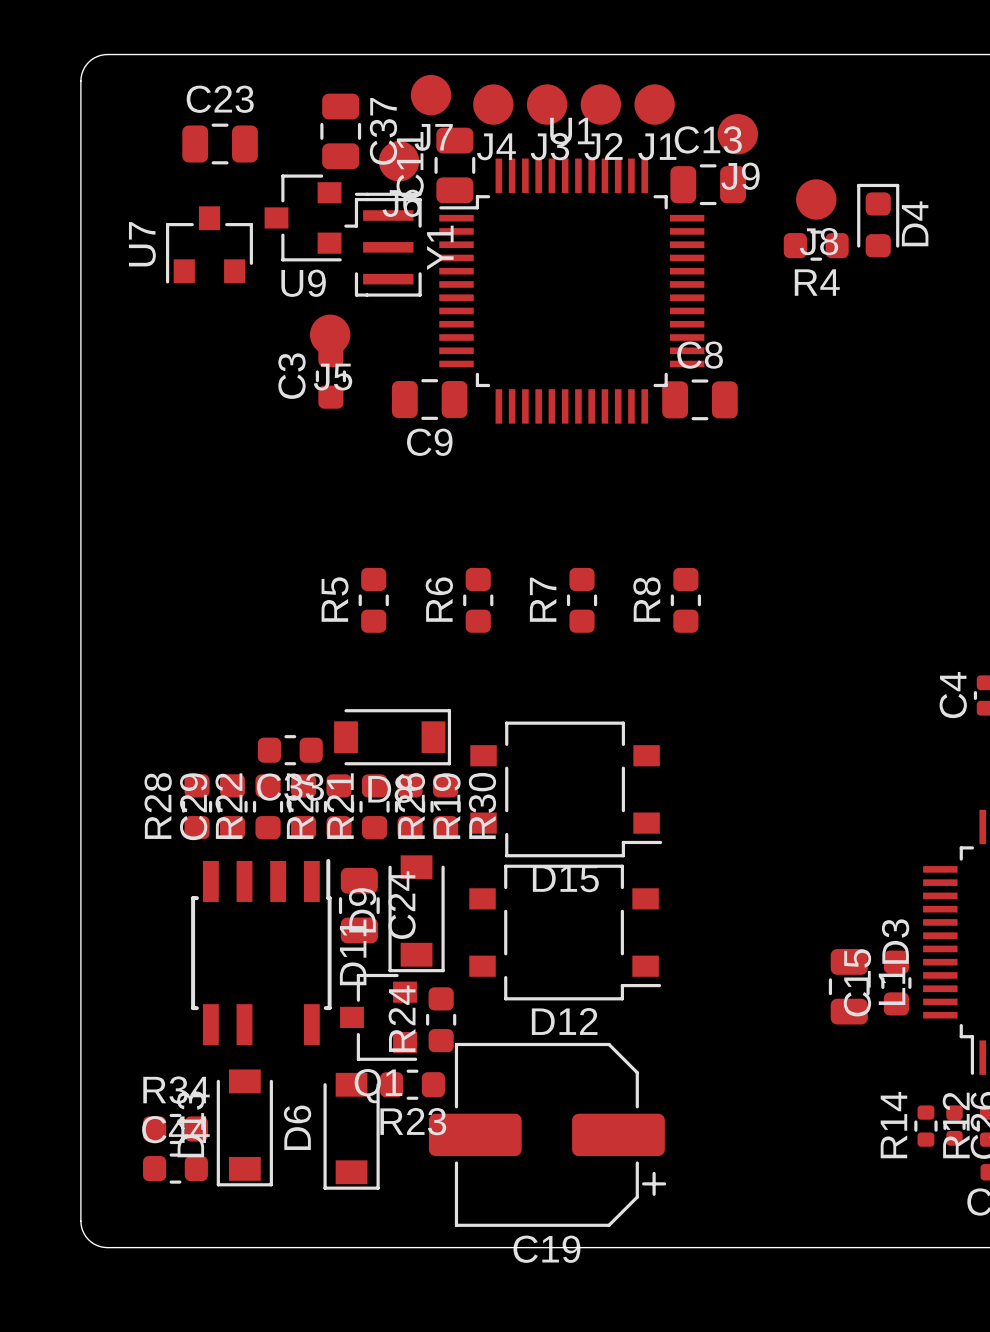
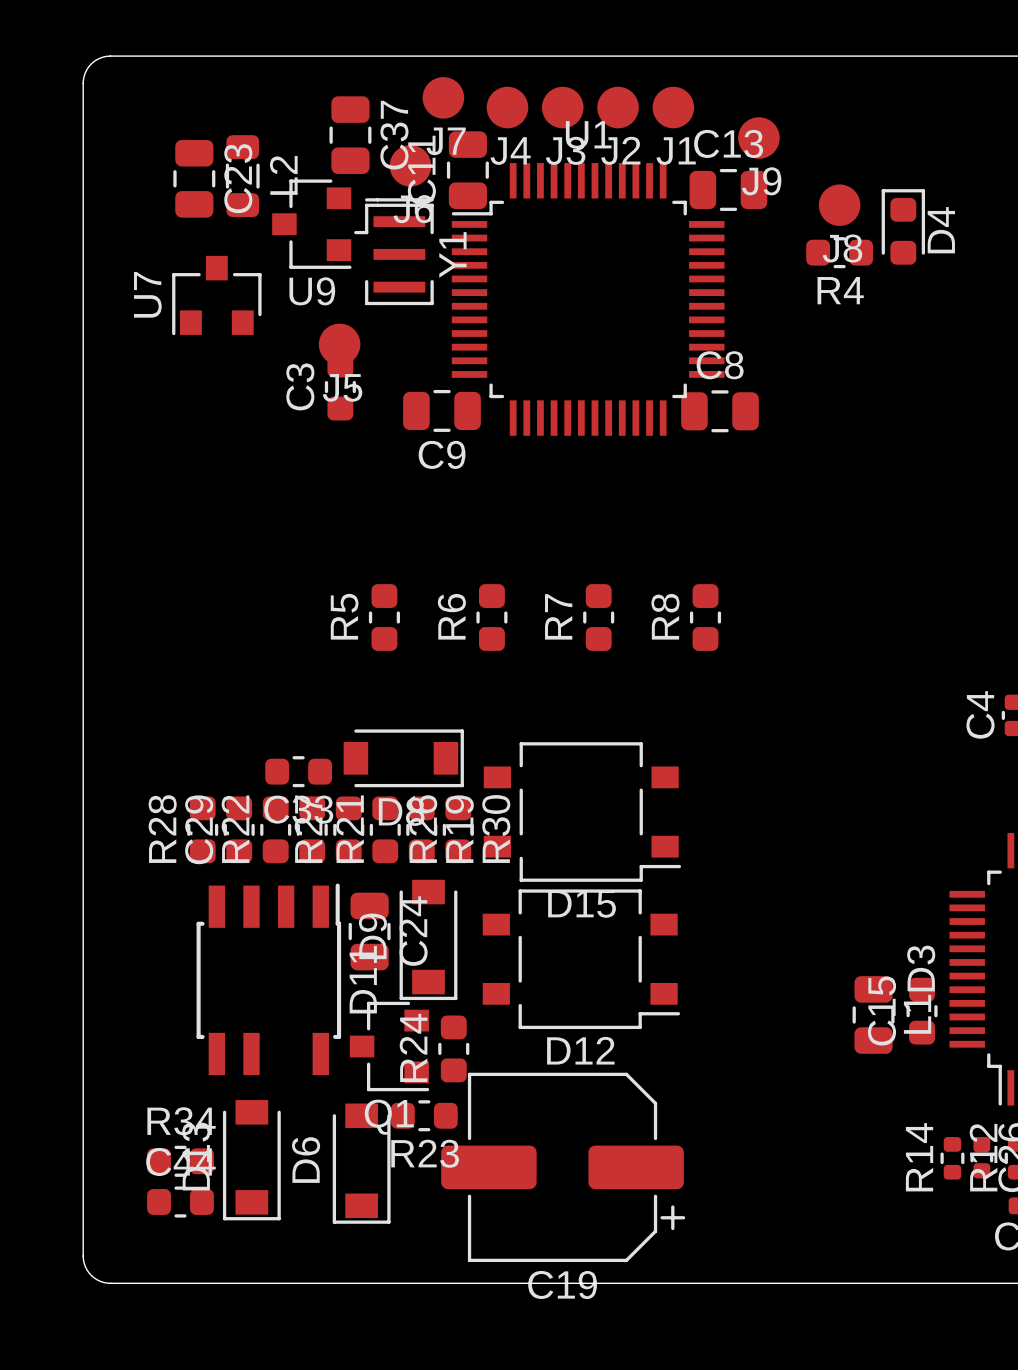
C23 rotation: 0° (220, 144) -> 90° clockwise (194, 178)
L2: none -> (242, 176)
U7 position: (209, 244) -> (216, 295)

